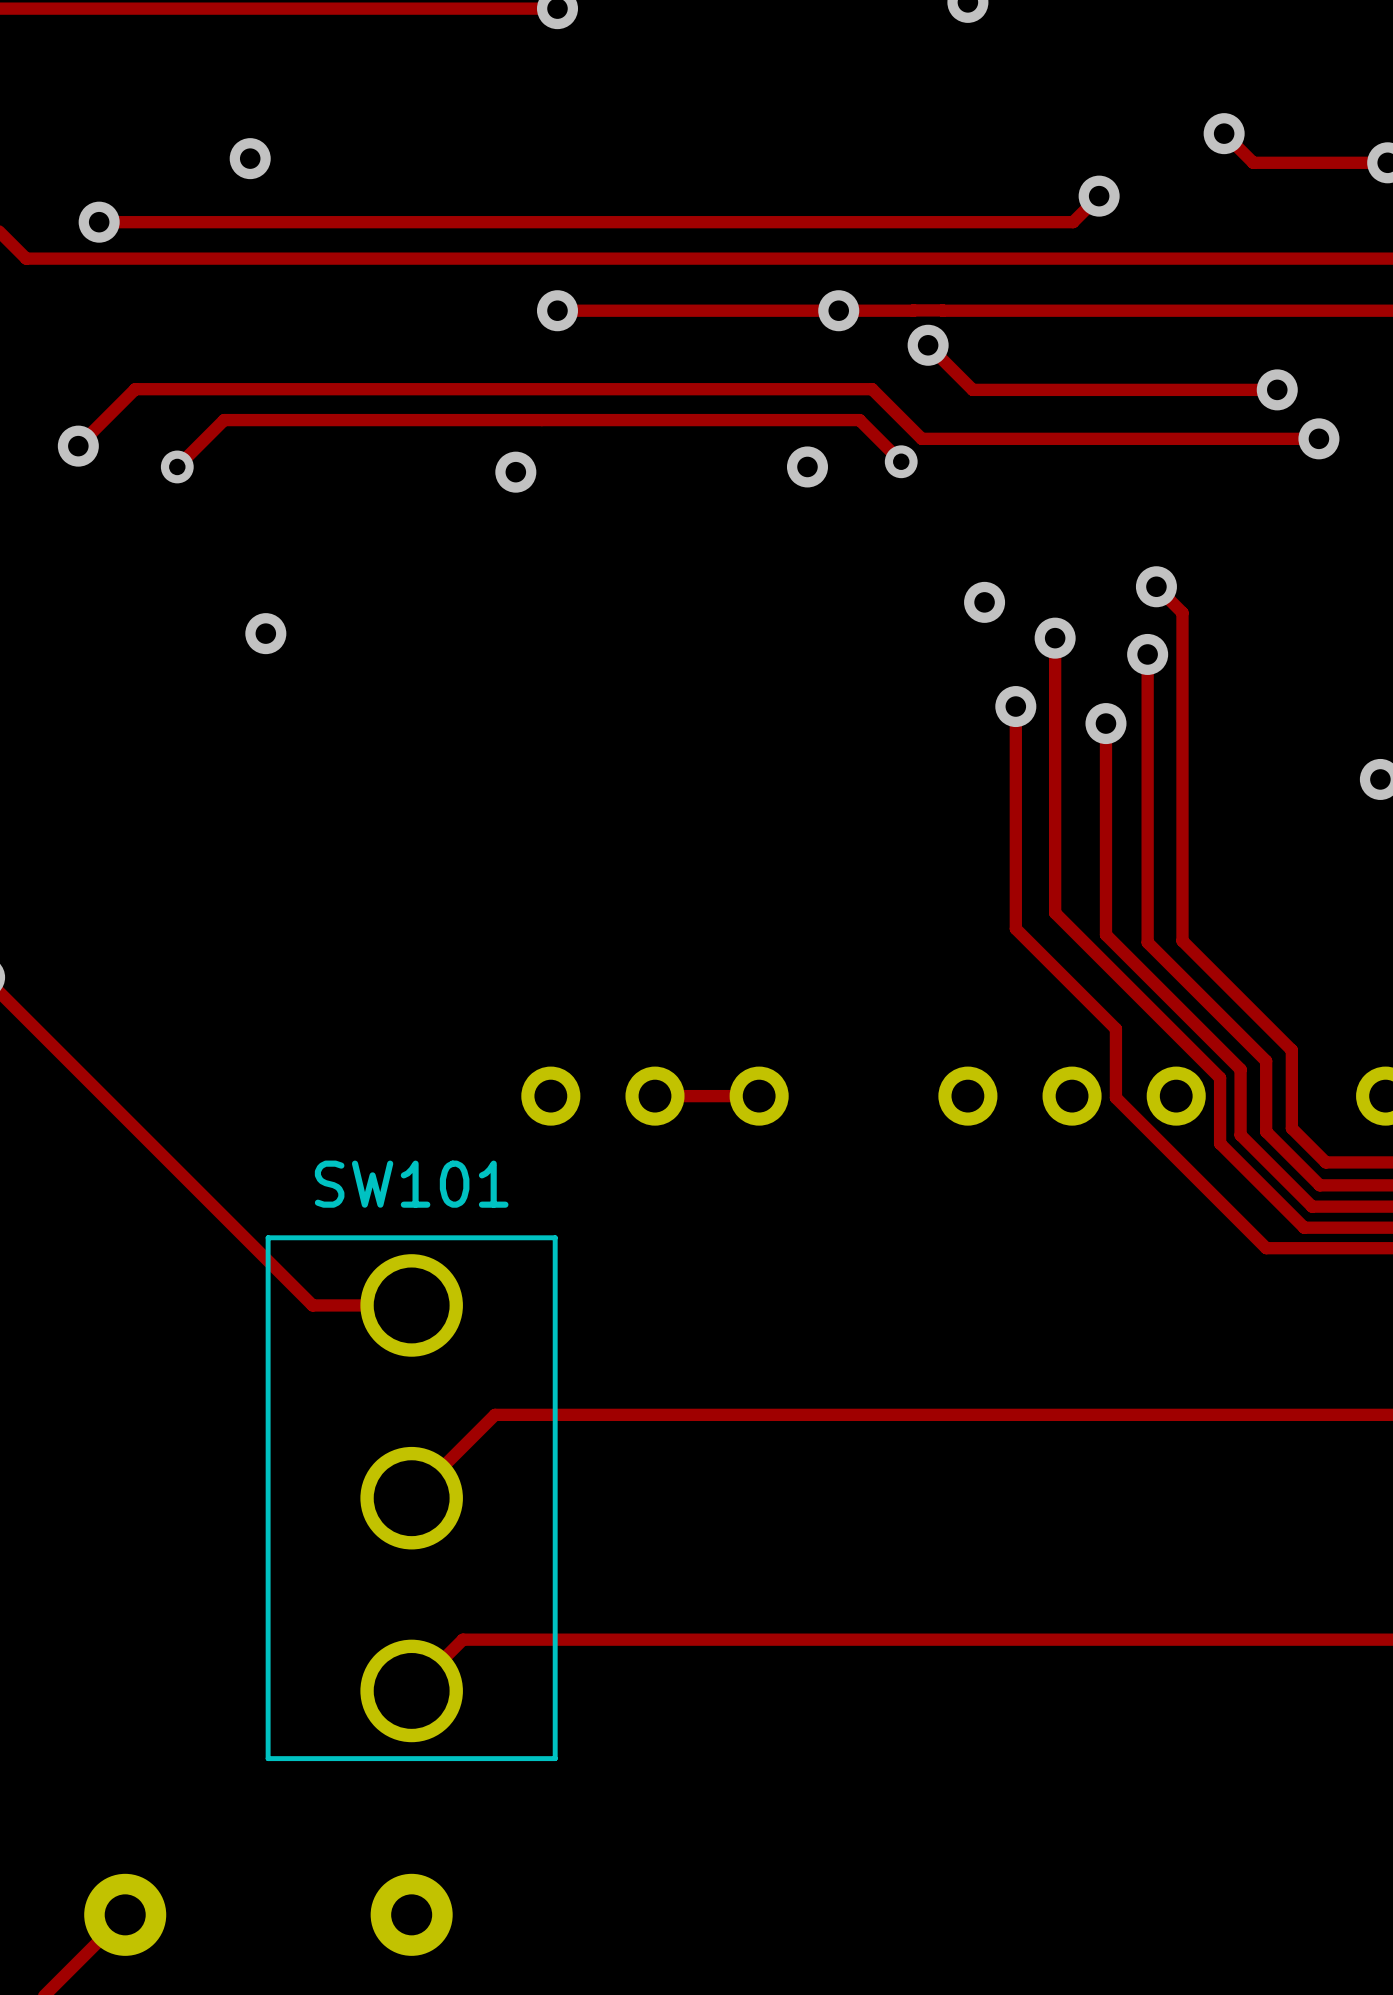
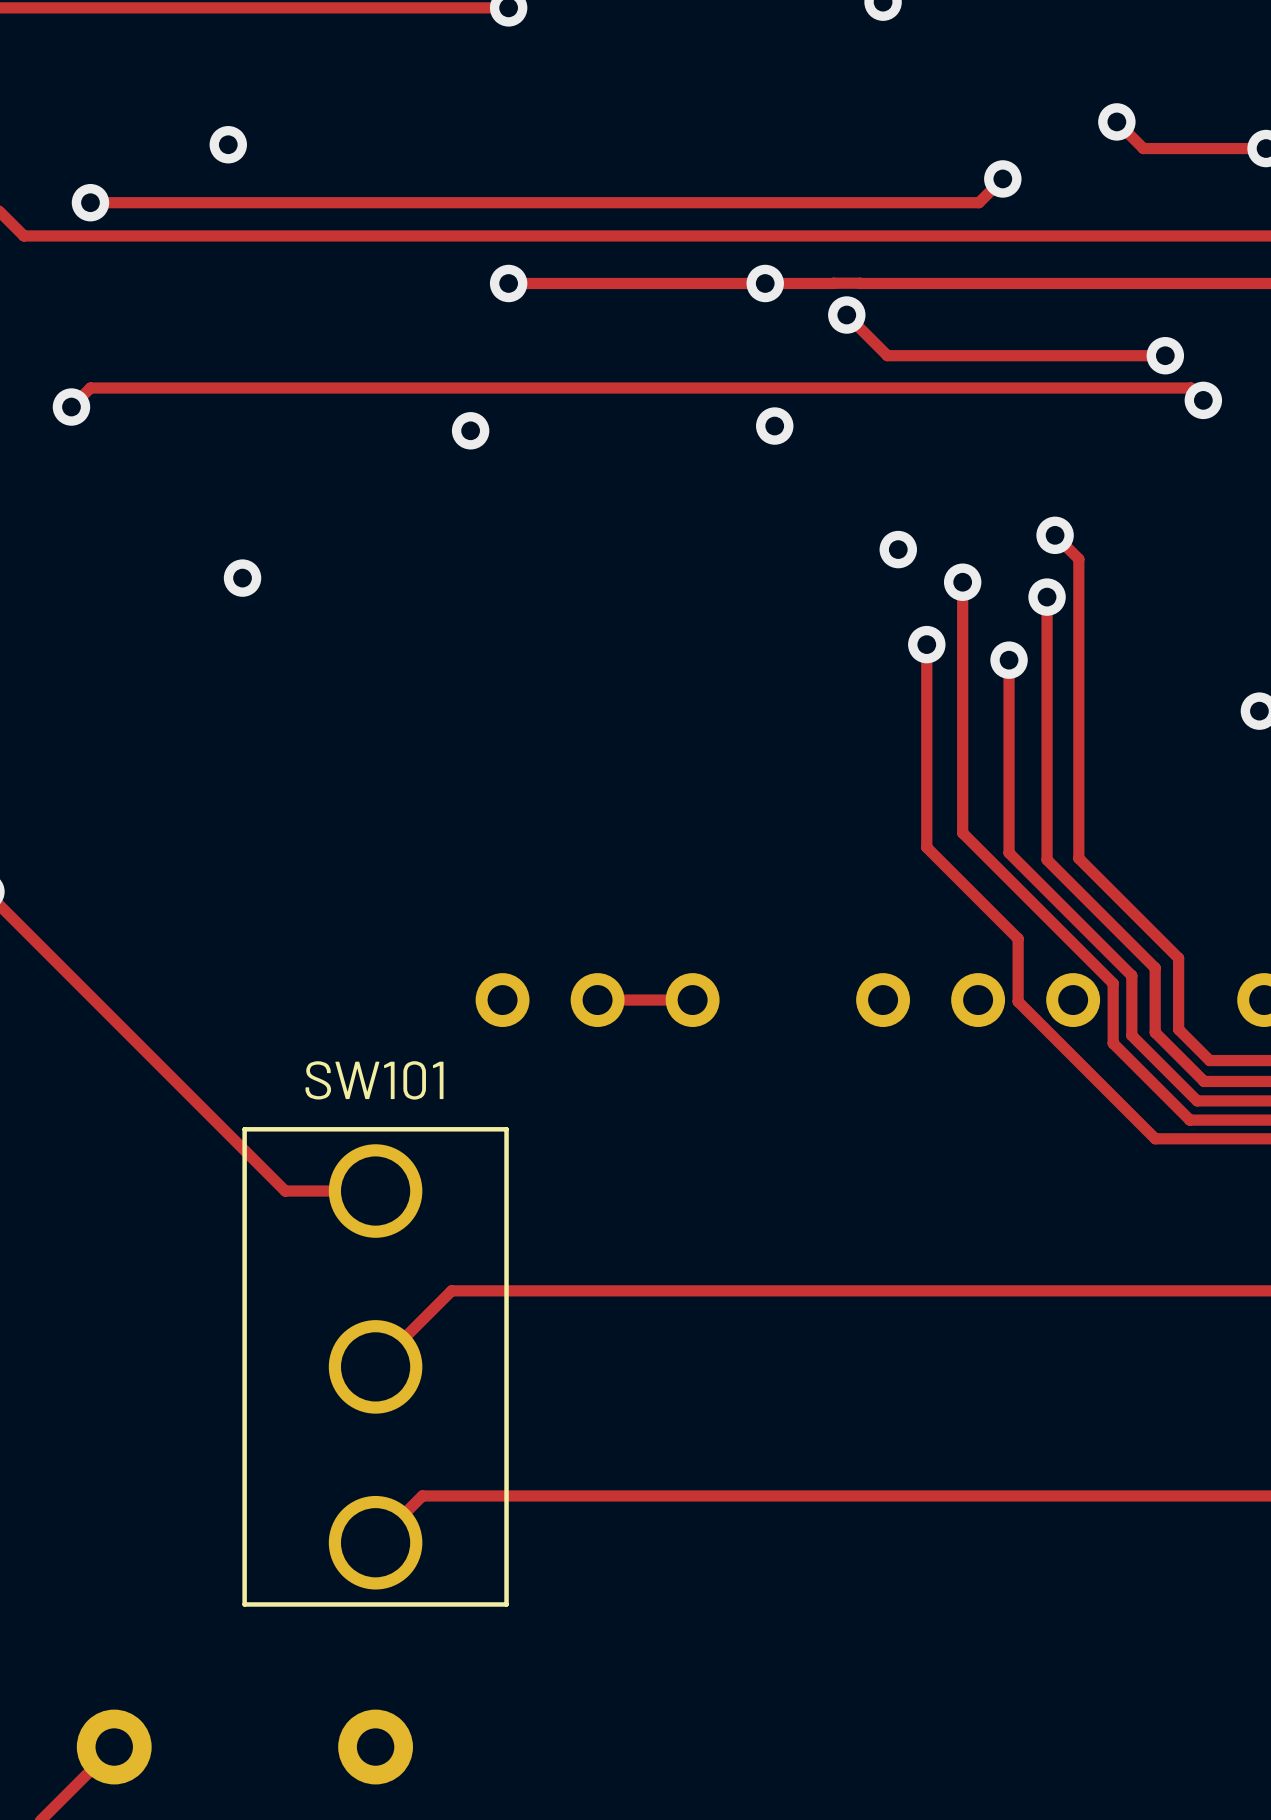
track: (99, 425) (135, 389) (872, 389) (921, 438) (1318, 438) -> (90, 388) (1190, 388) (1203, 400)
track: (901, 461) (859, 420) (224, 420) (177, 466) -> none
via: (901, 461) -> none
via: (177, 466) -> none
via position: (807, 466) -> (774, 426)

